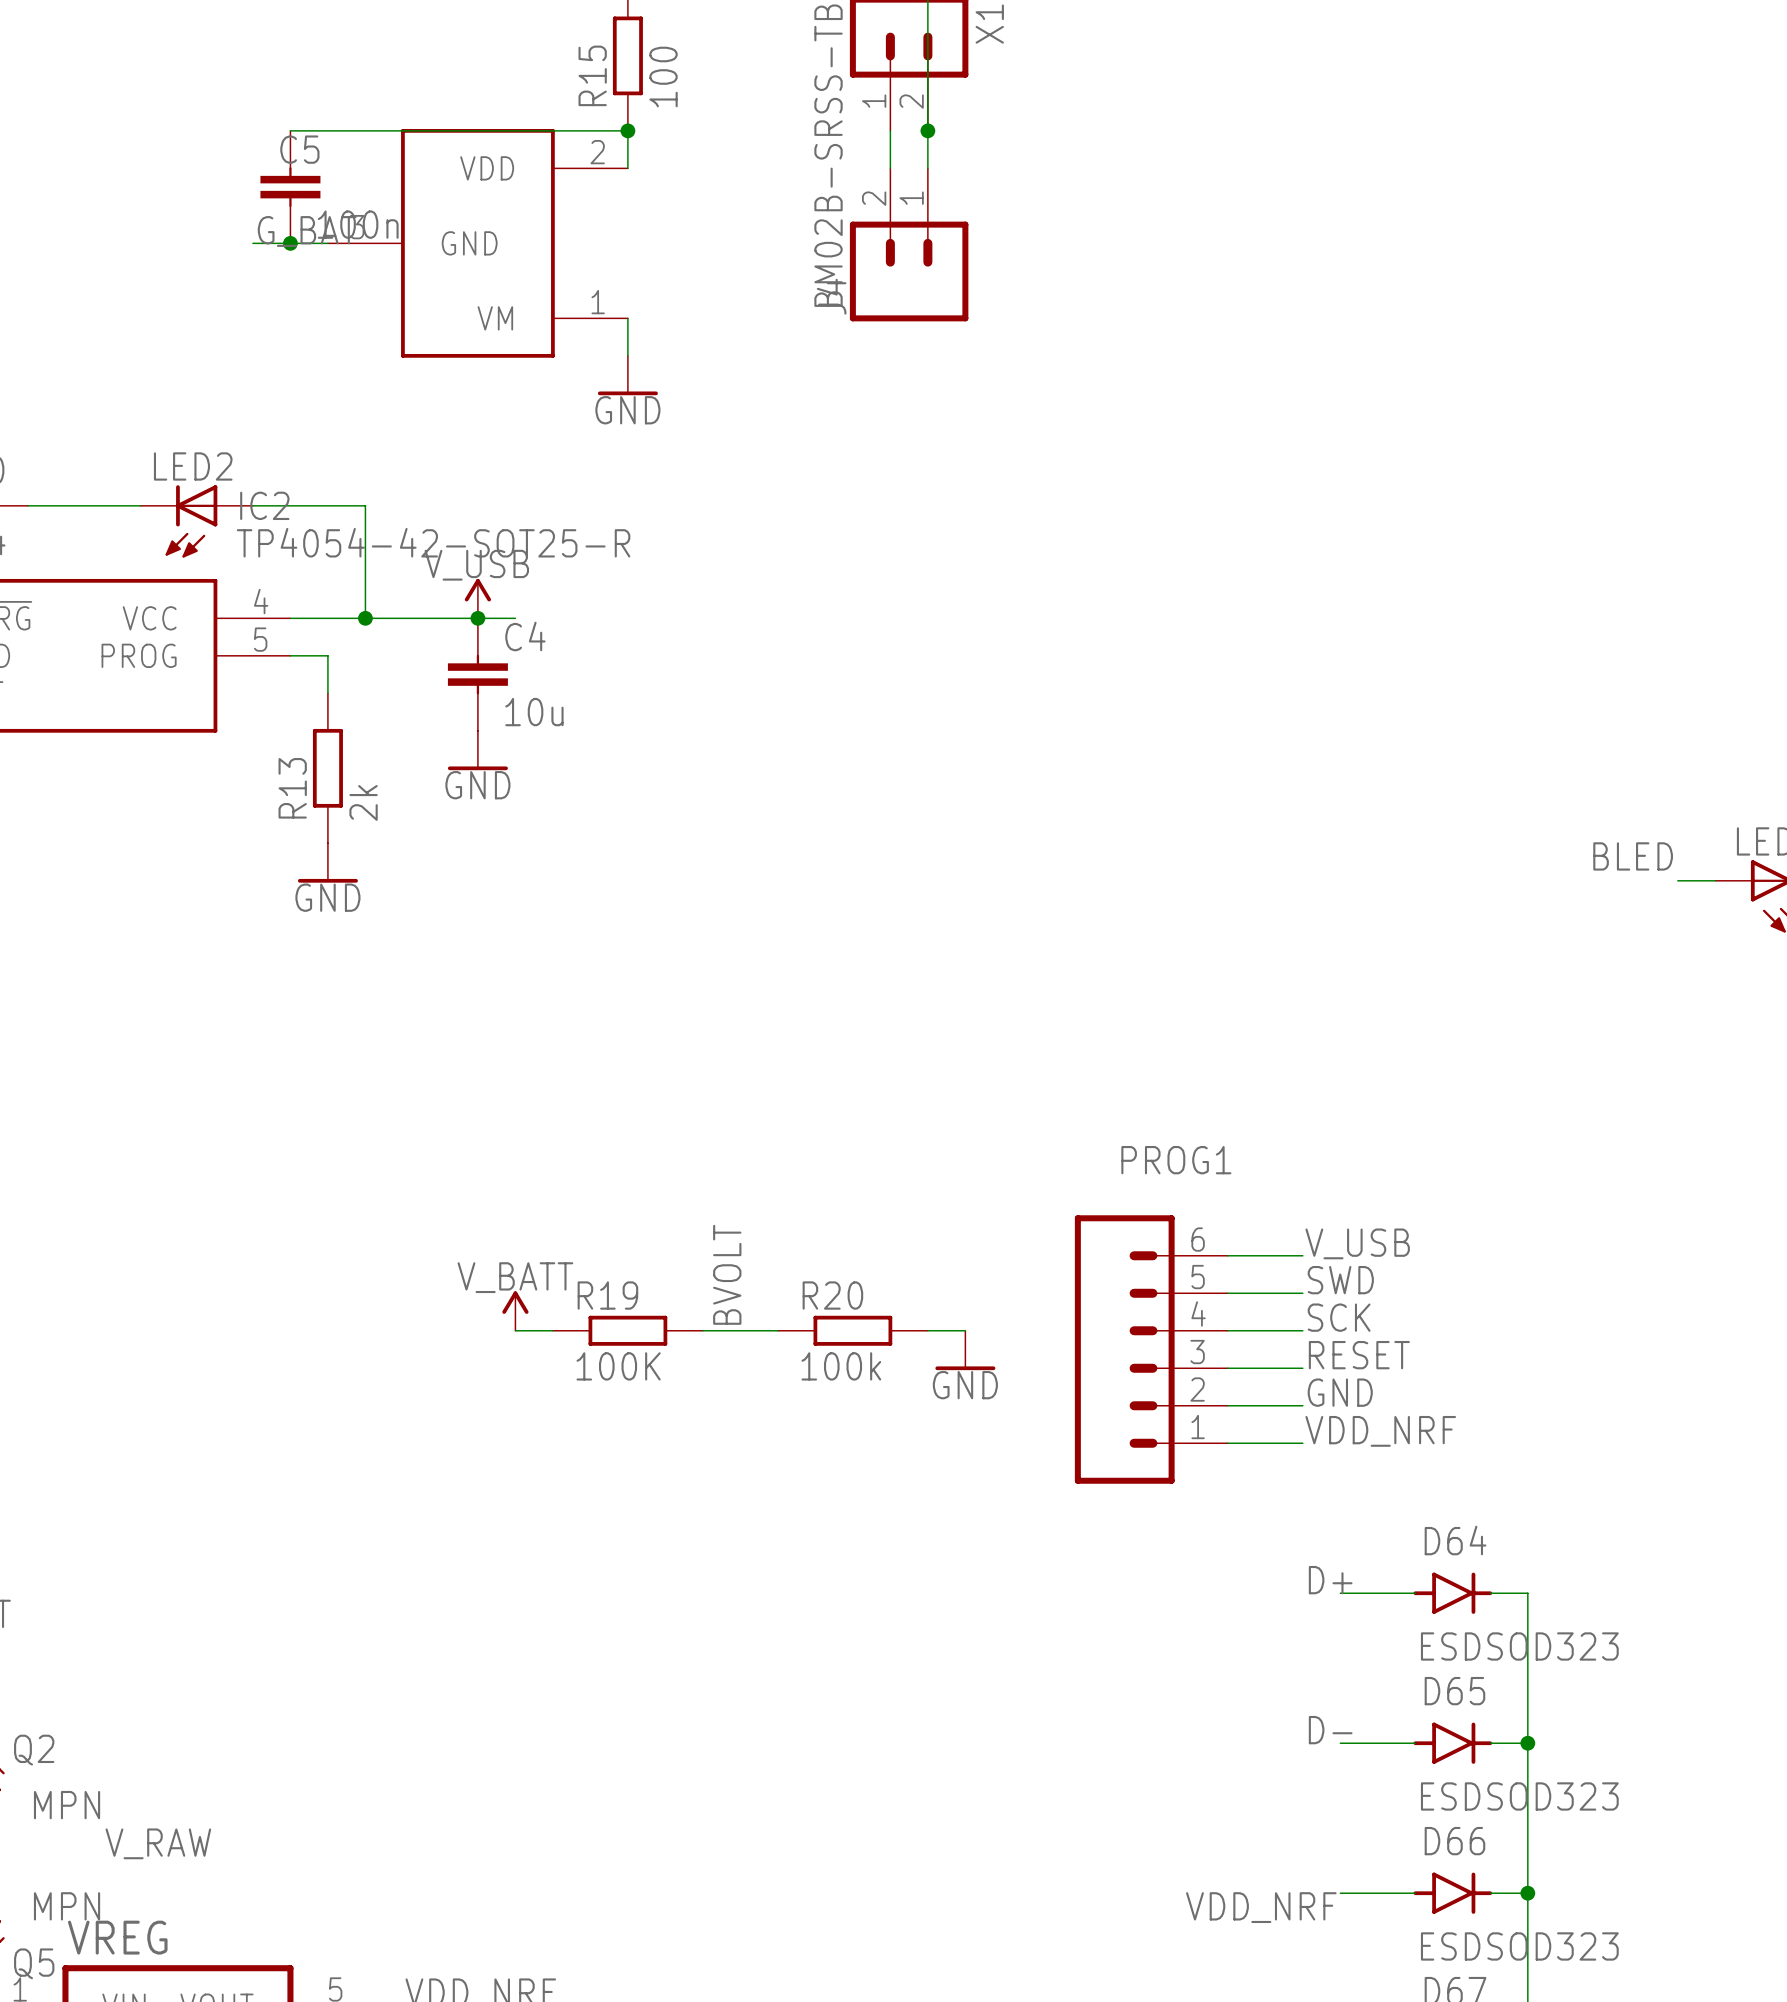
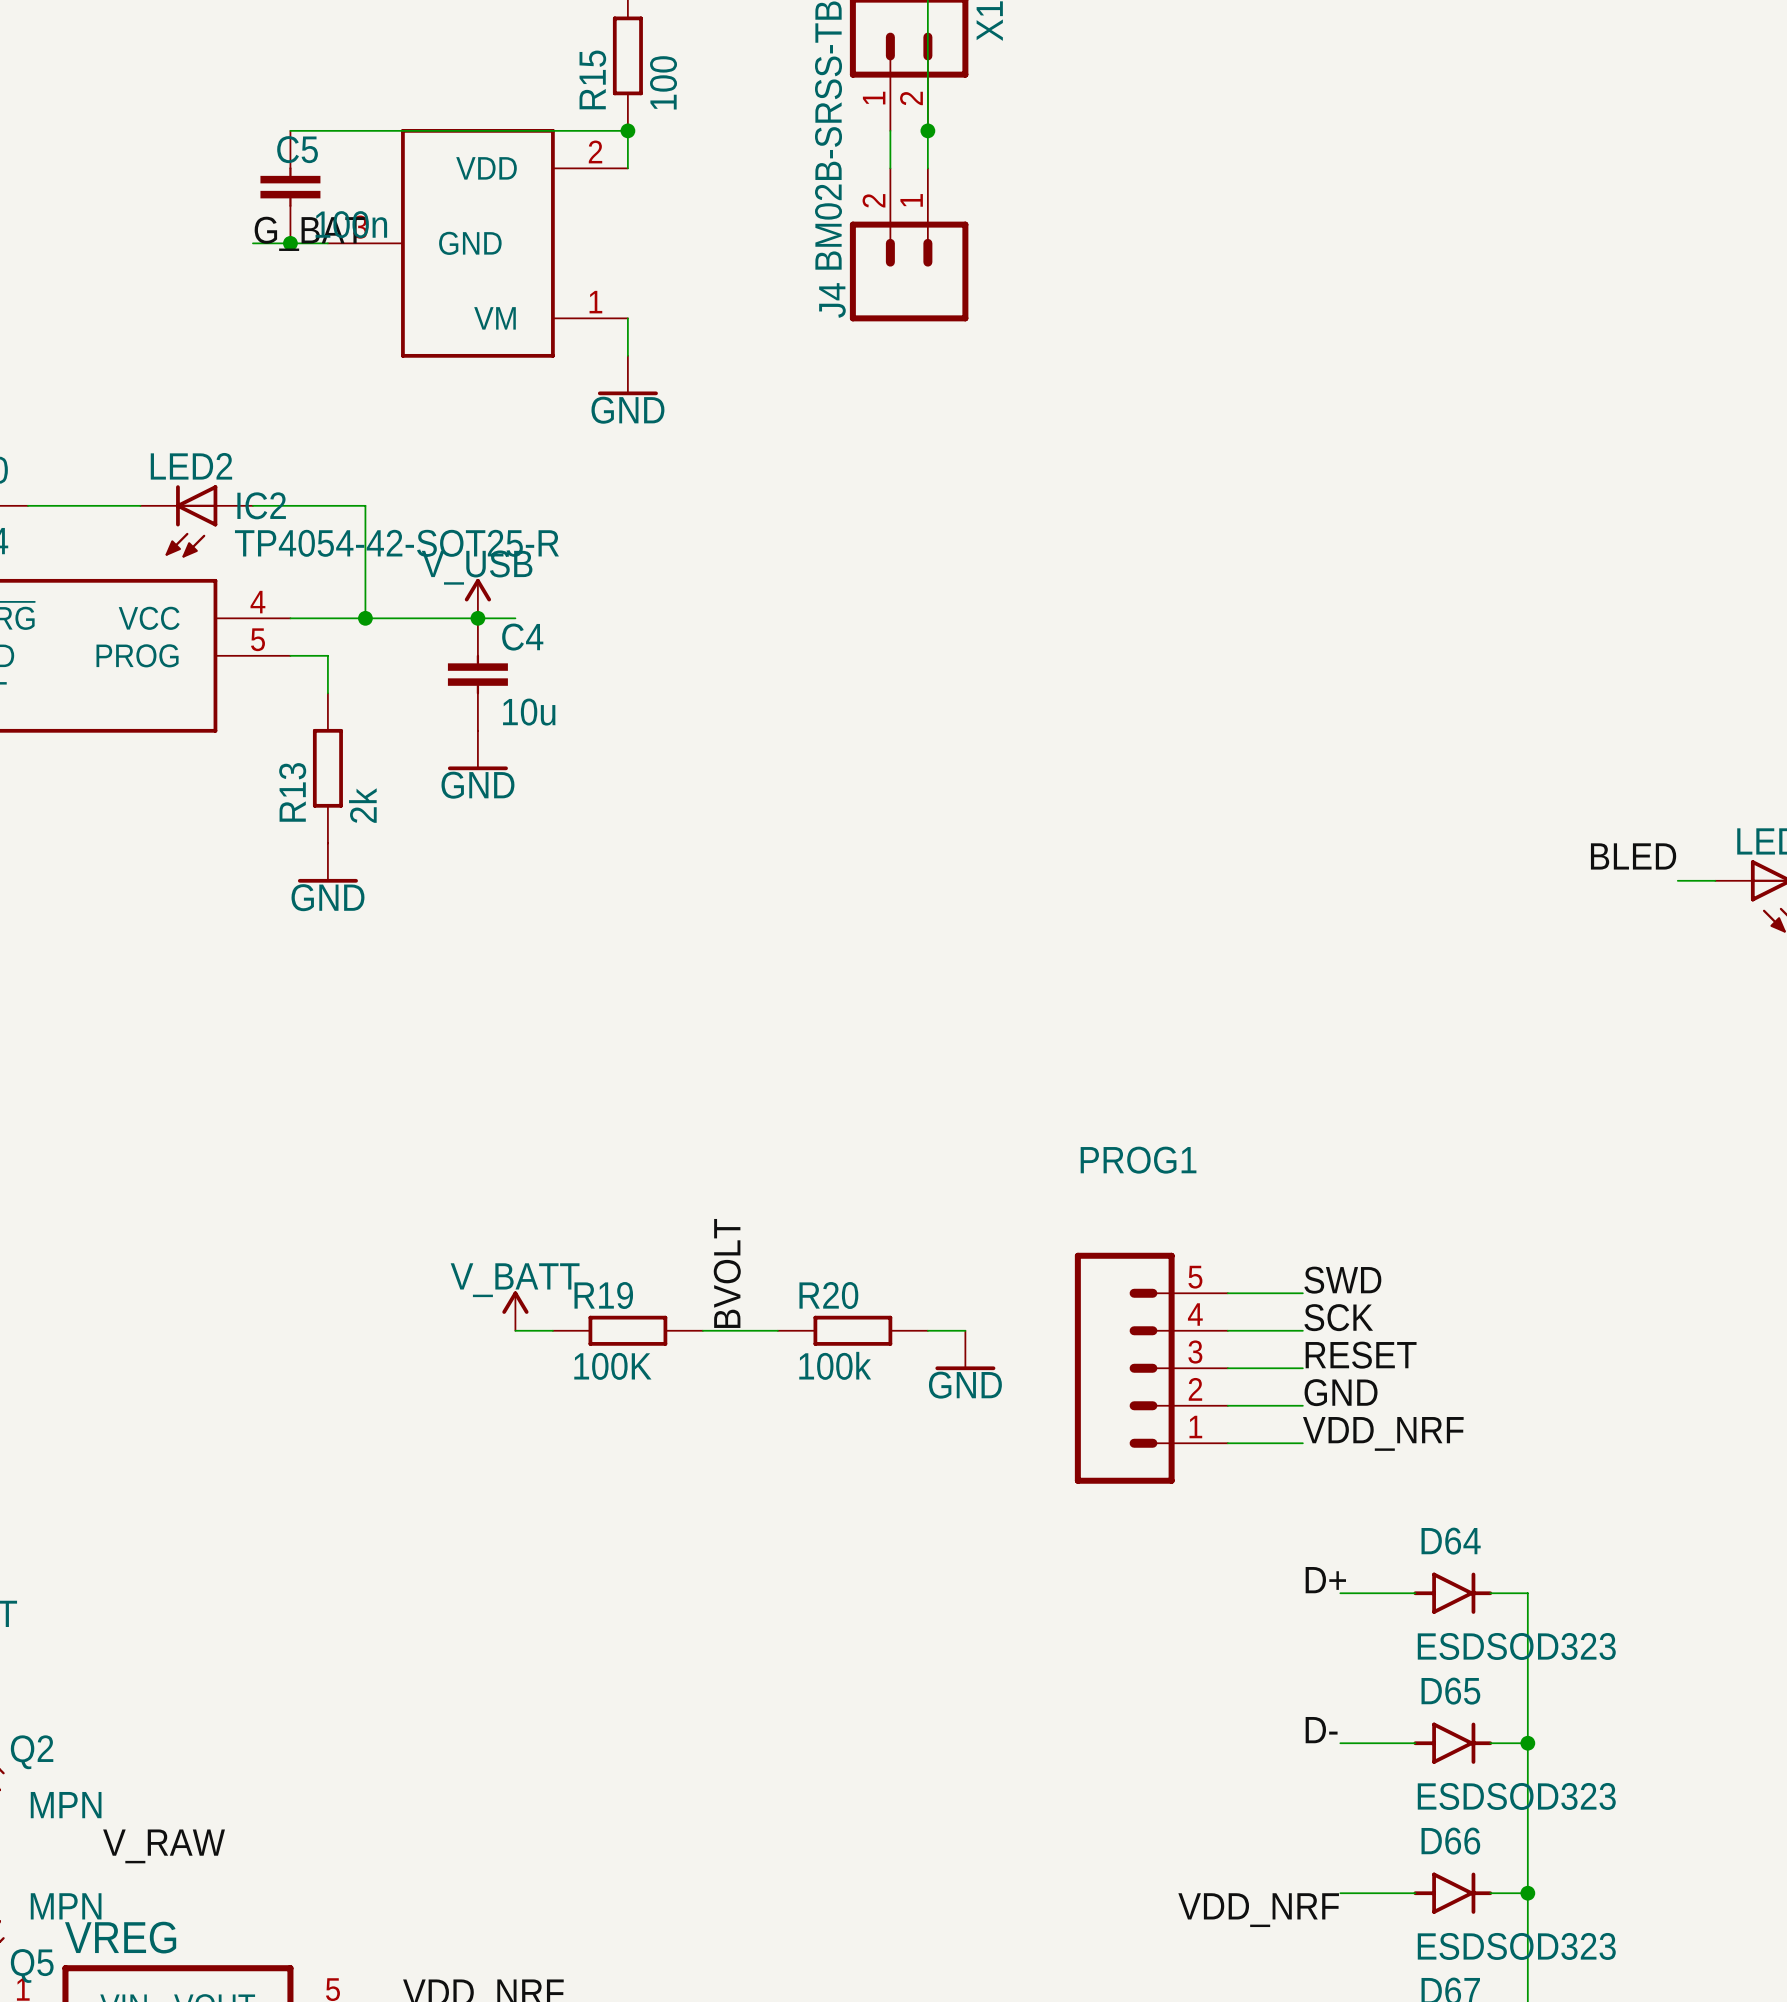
PROG1 name position: PROG1 (1176, 1160) -> PROG1 (1138, 1160)
PROG1 symbol: [1074, 1215, 1228, 1484] -> [1074, 1252, 1228, 1484]
label: V_USB (1357, 1243) -> none
wire: (1227, 1255) (1302, 1255) -> none

